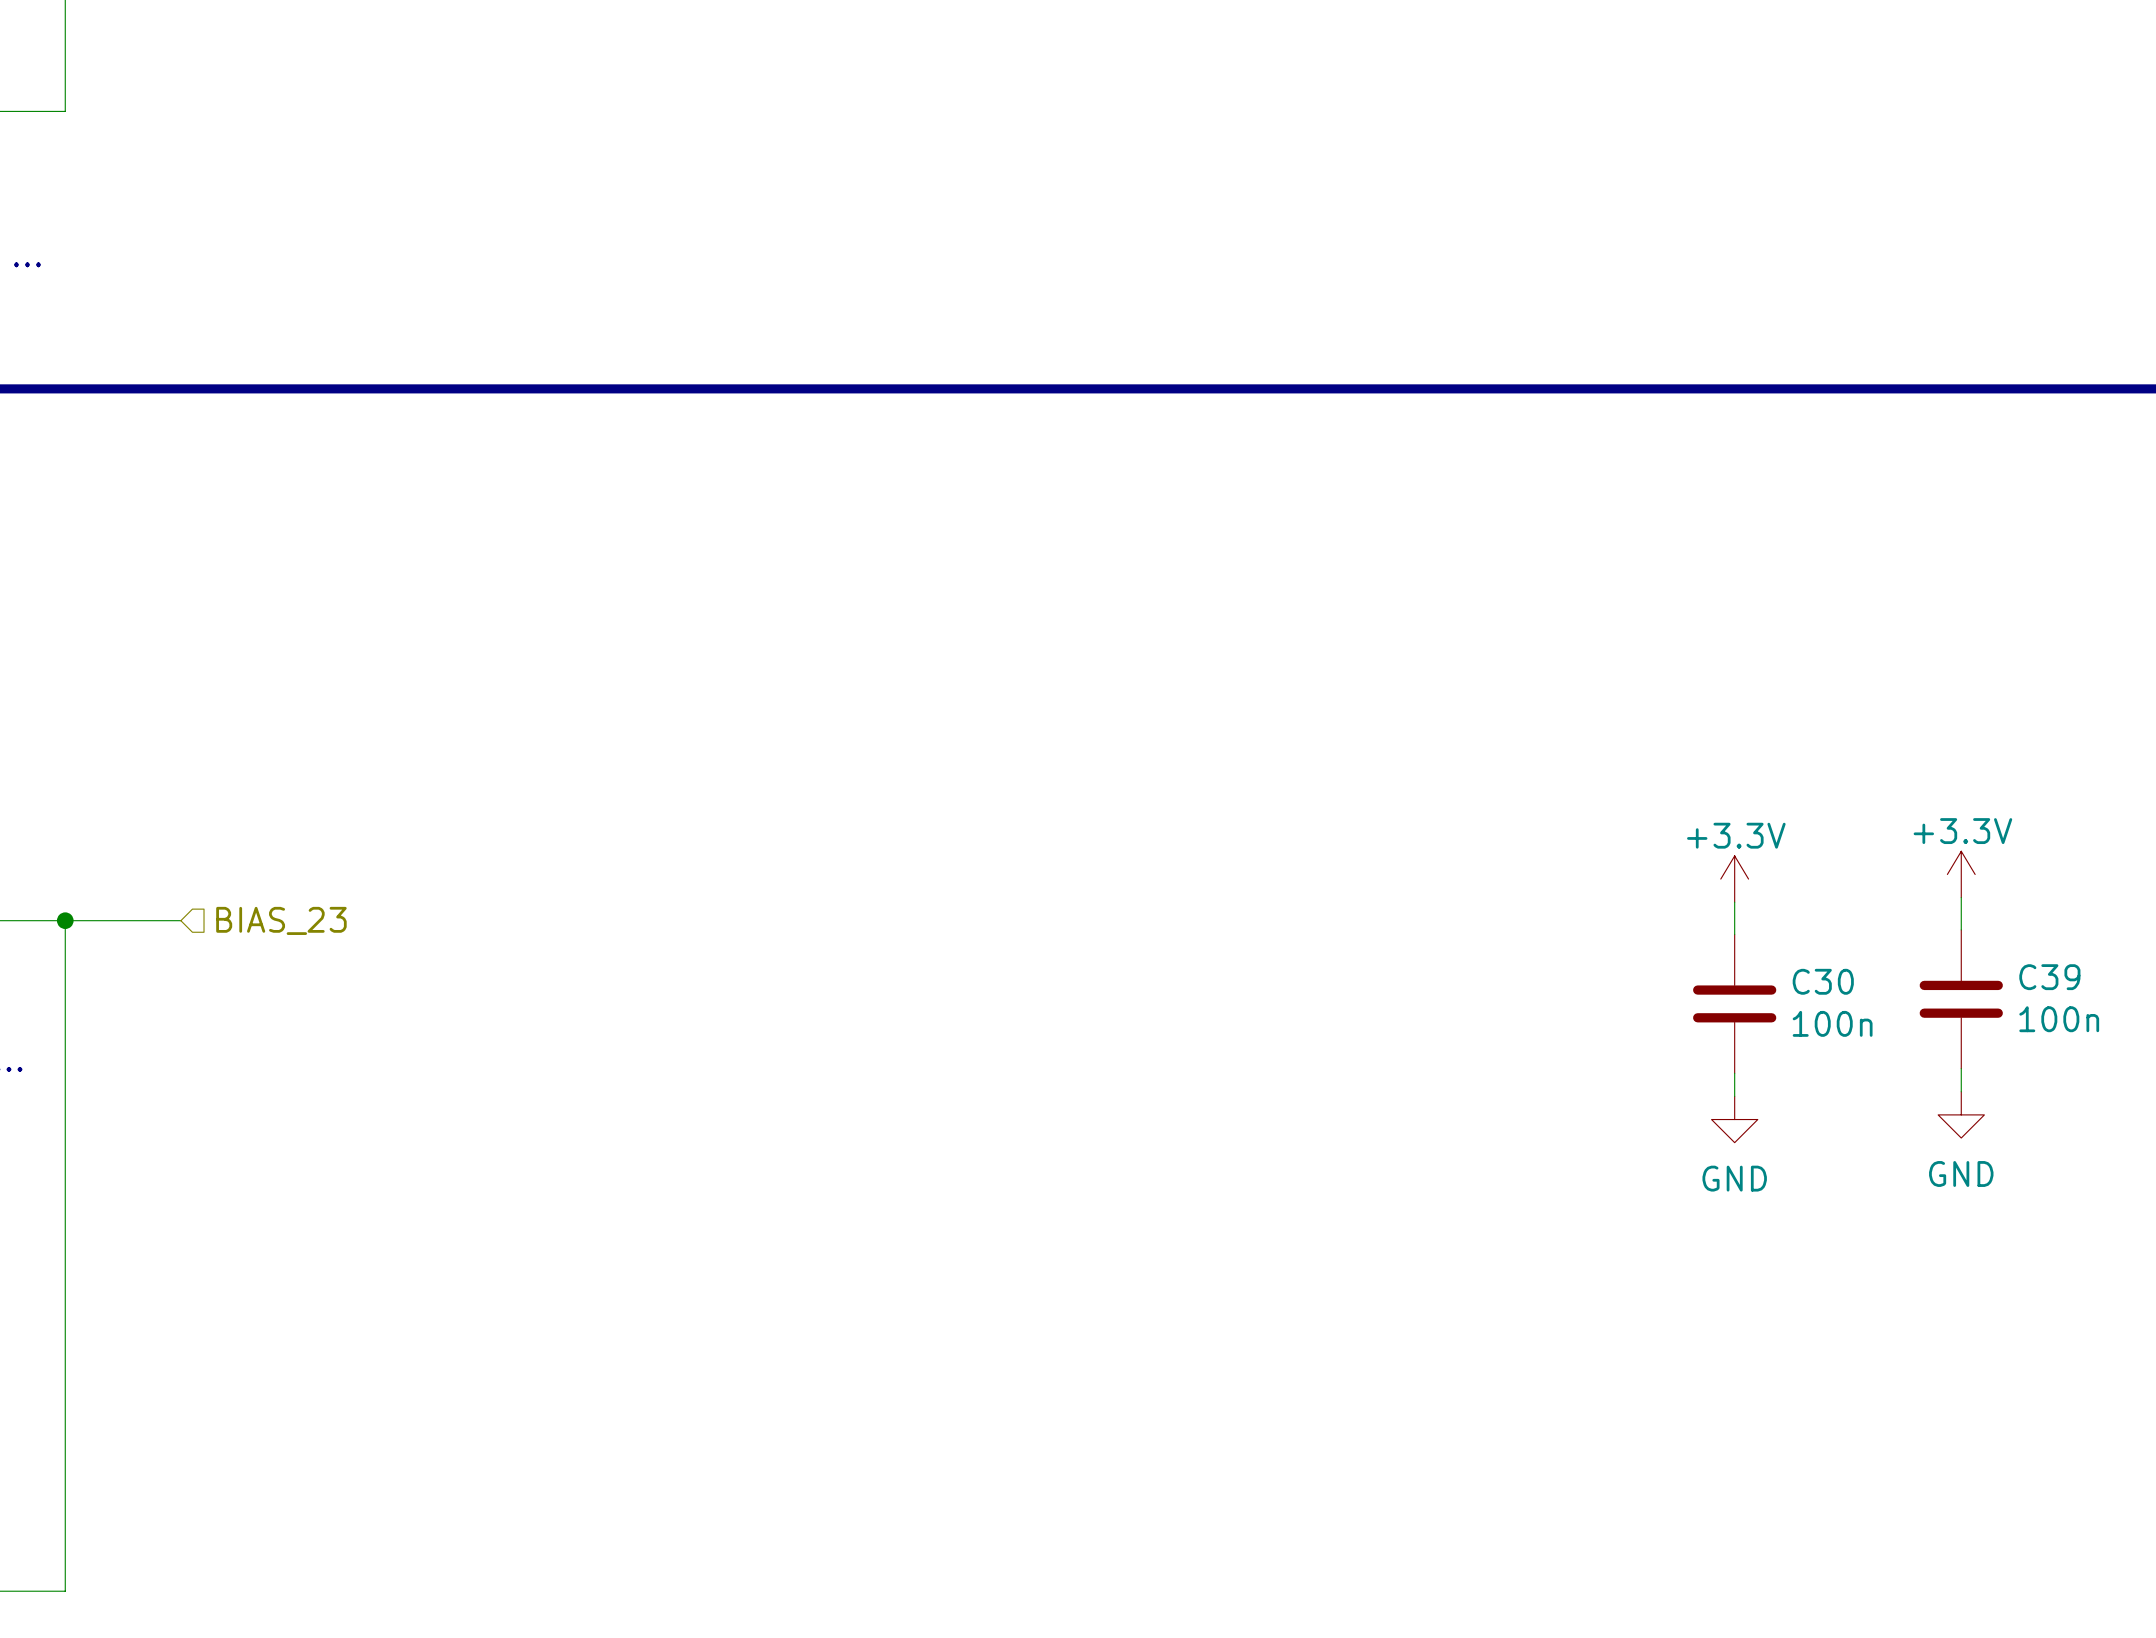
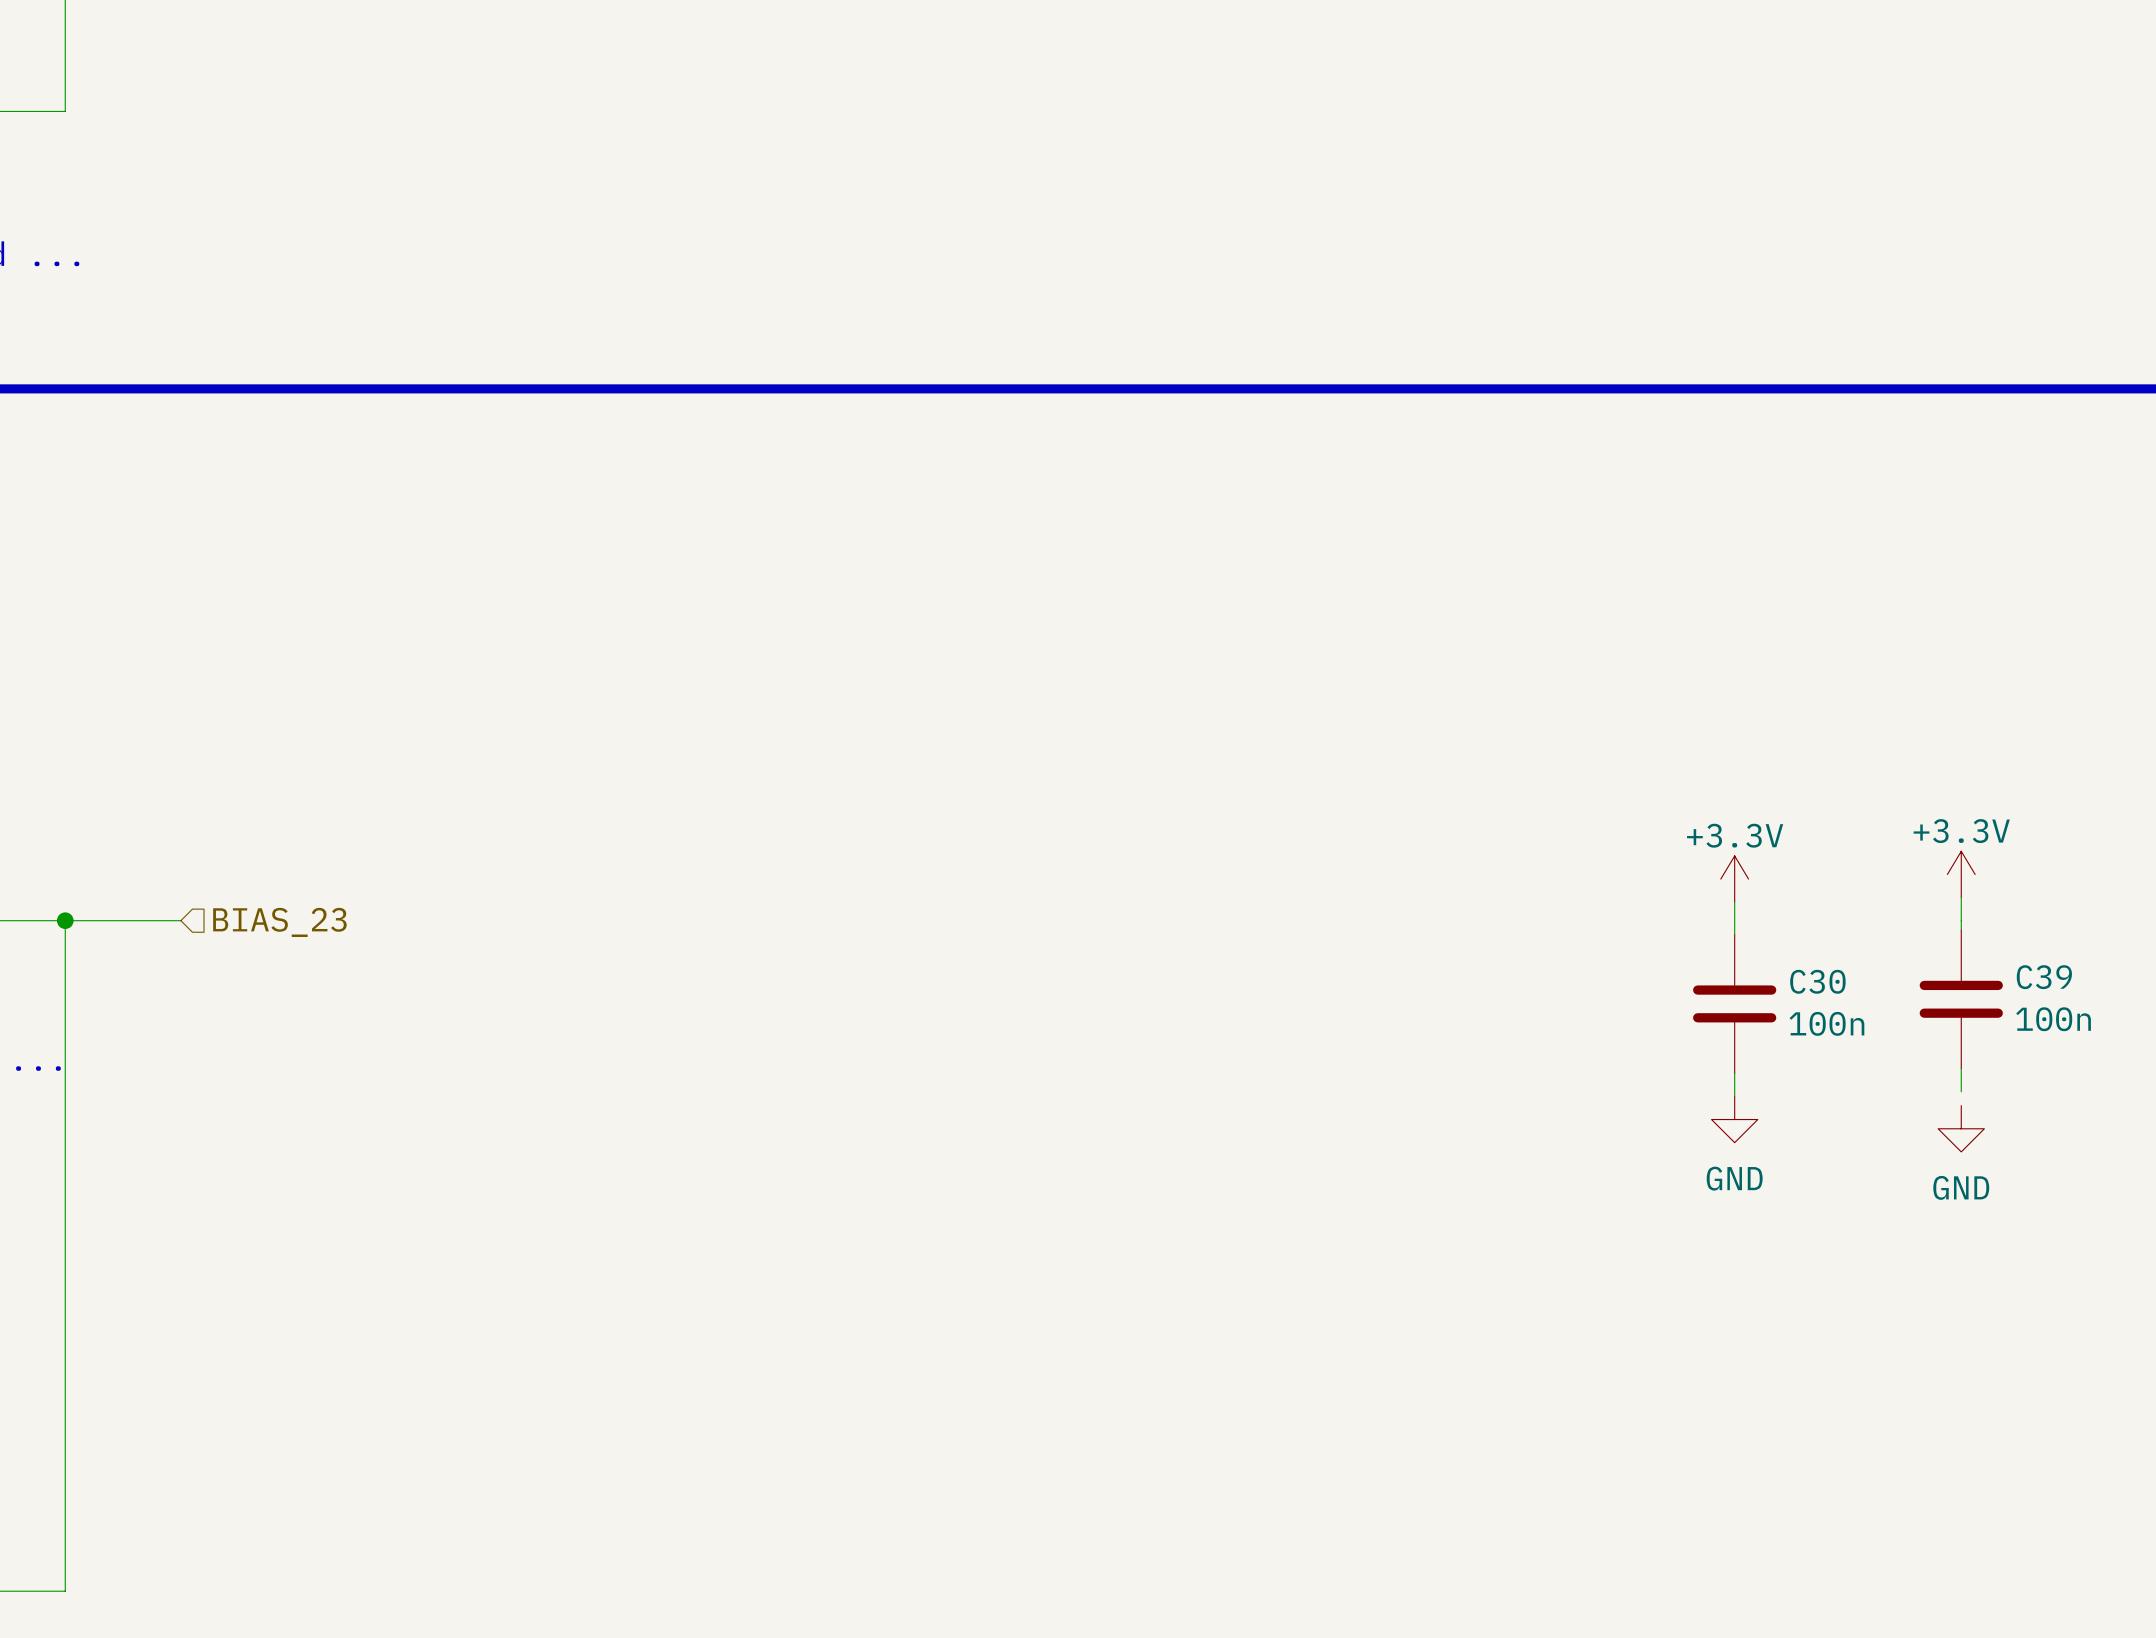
power symbol position: GND (1961, 1114) -> GND (1961, 1128)

